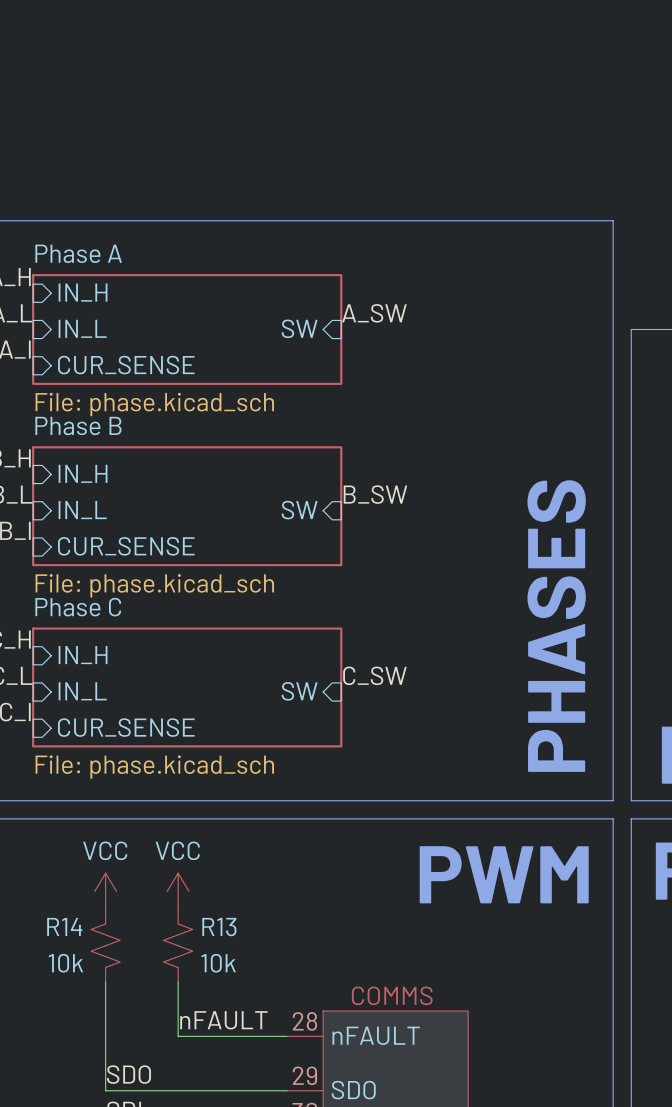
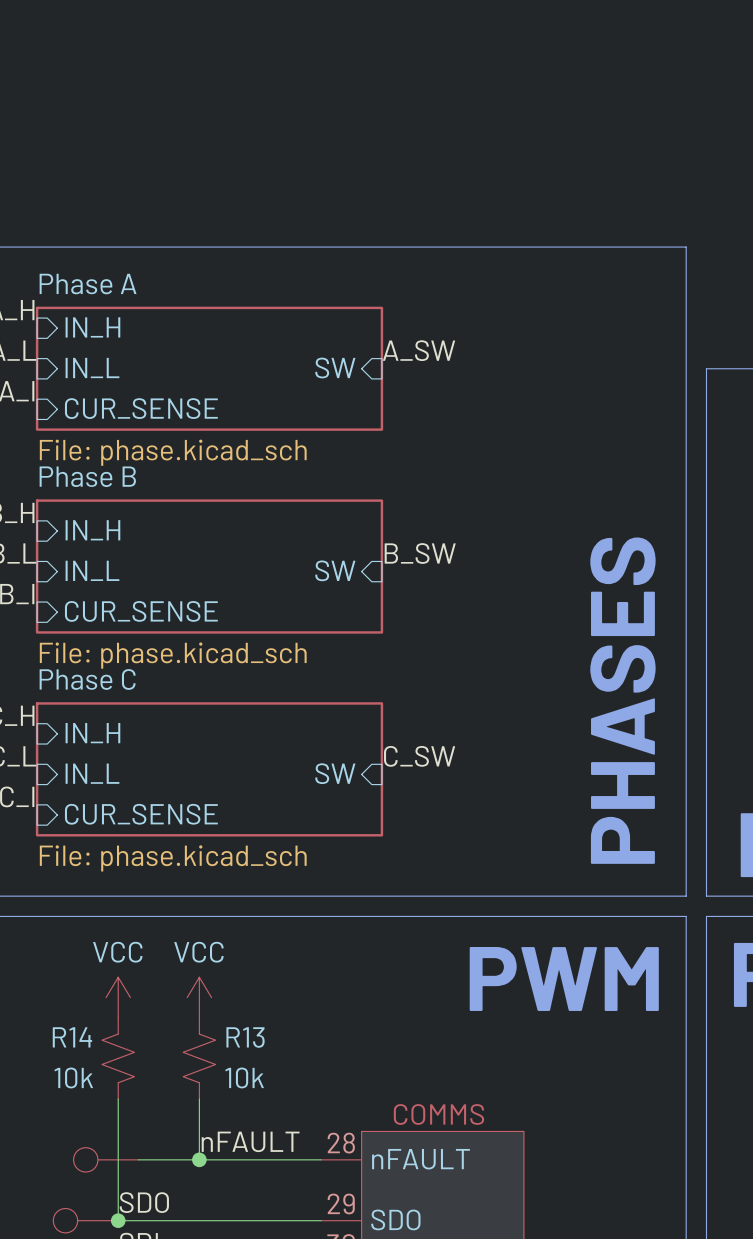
part: none -> (106, 1159)
wire: none -> (138, 1159) (199, 1159)
junction: none -> (199, 1159)
part: none -> (85, 1220)
junction: none -> (118, 1220)

